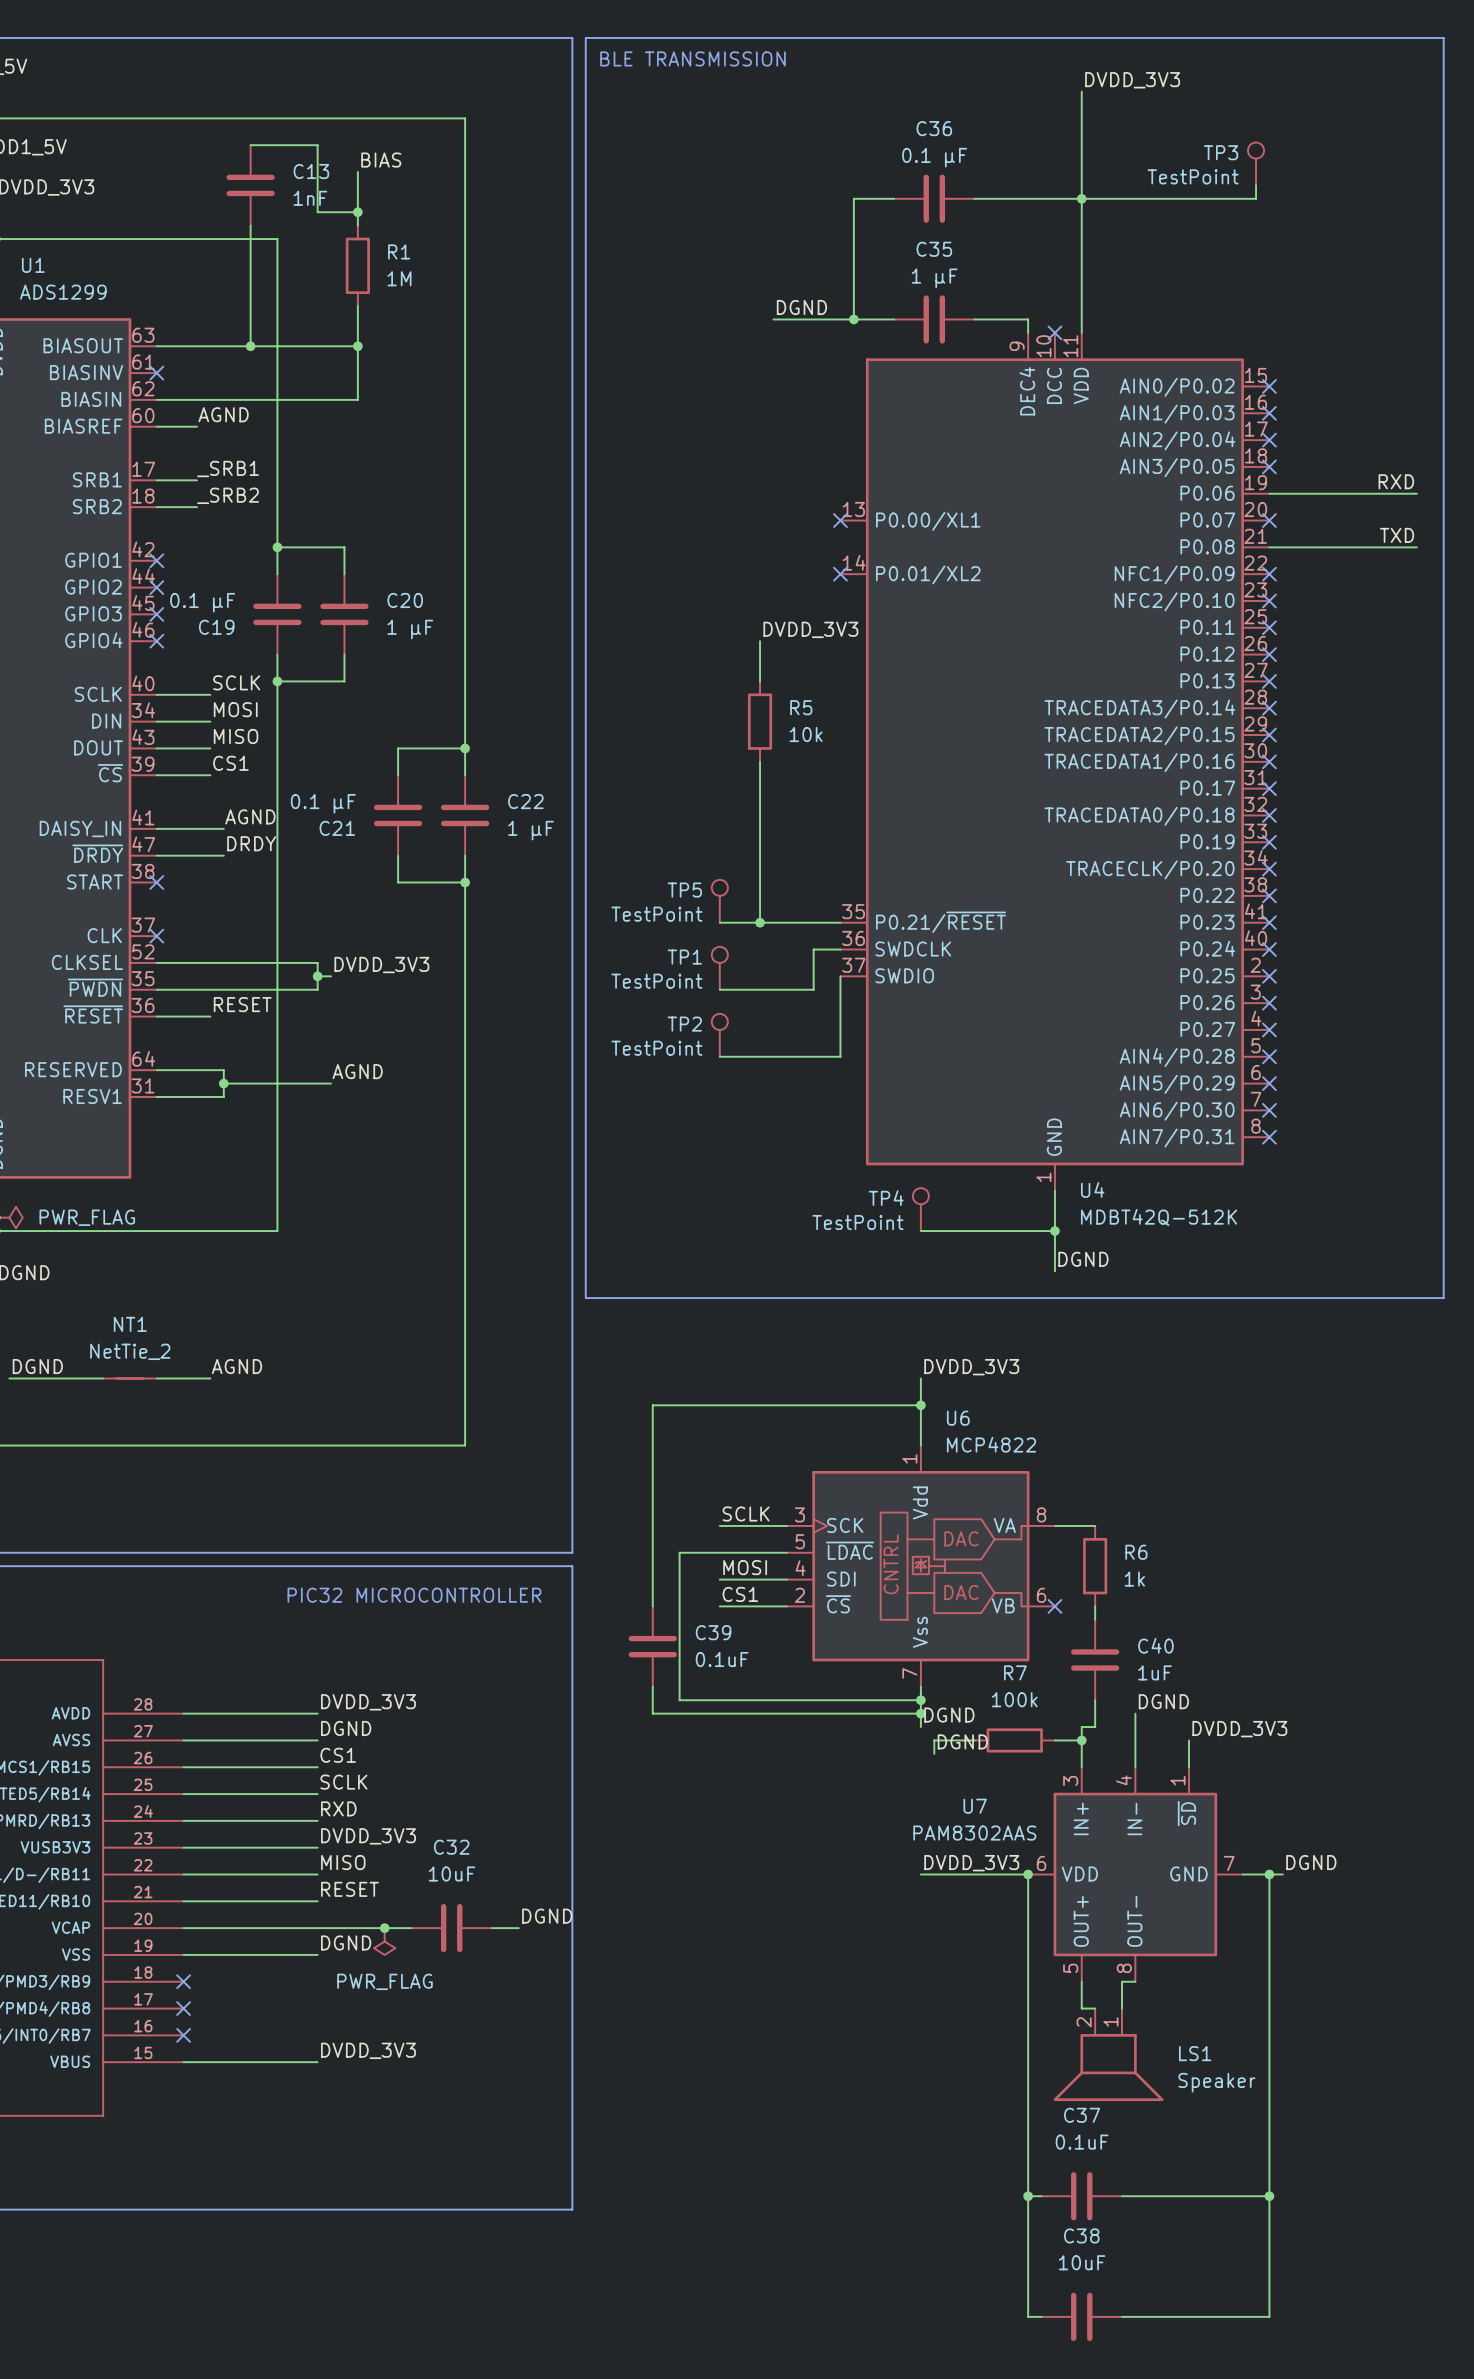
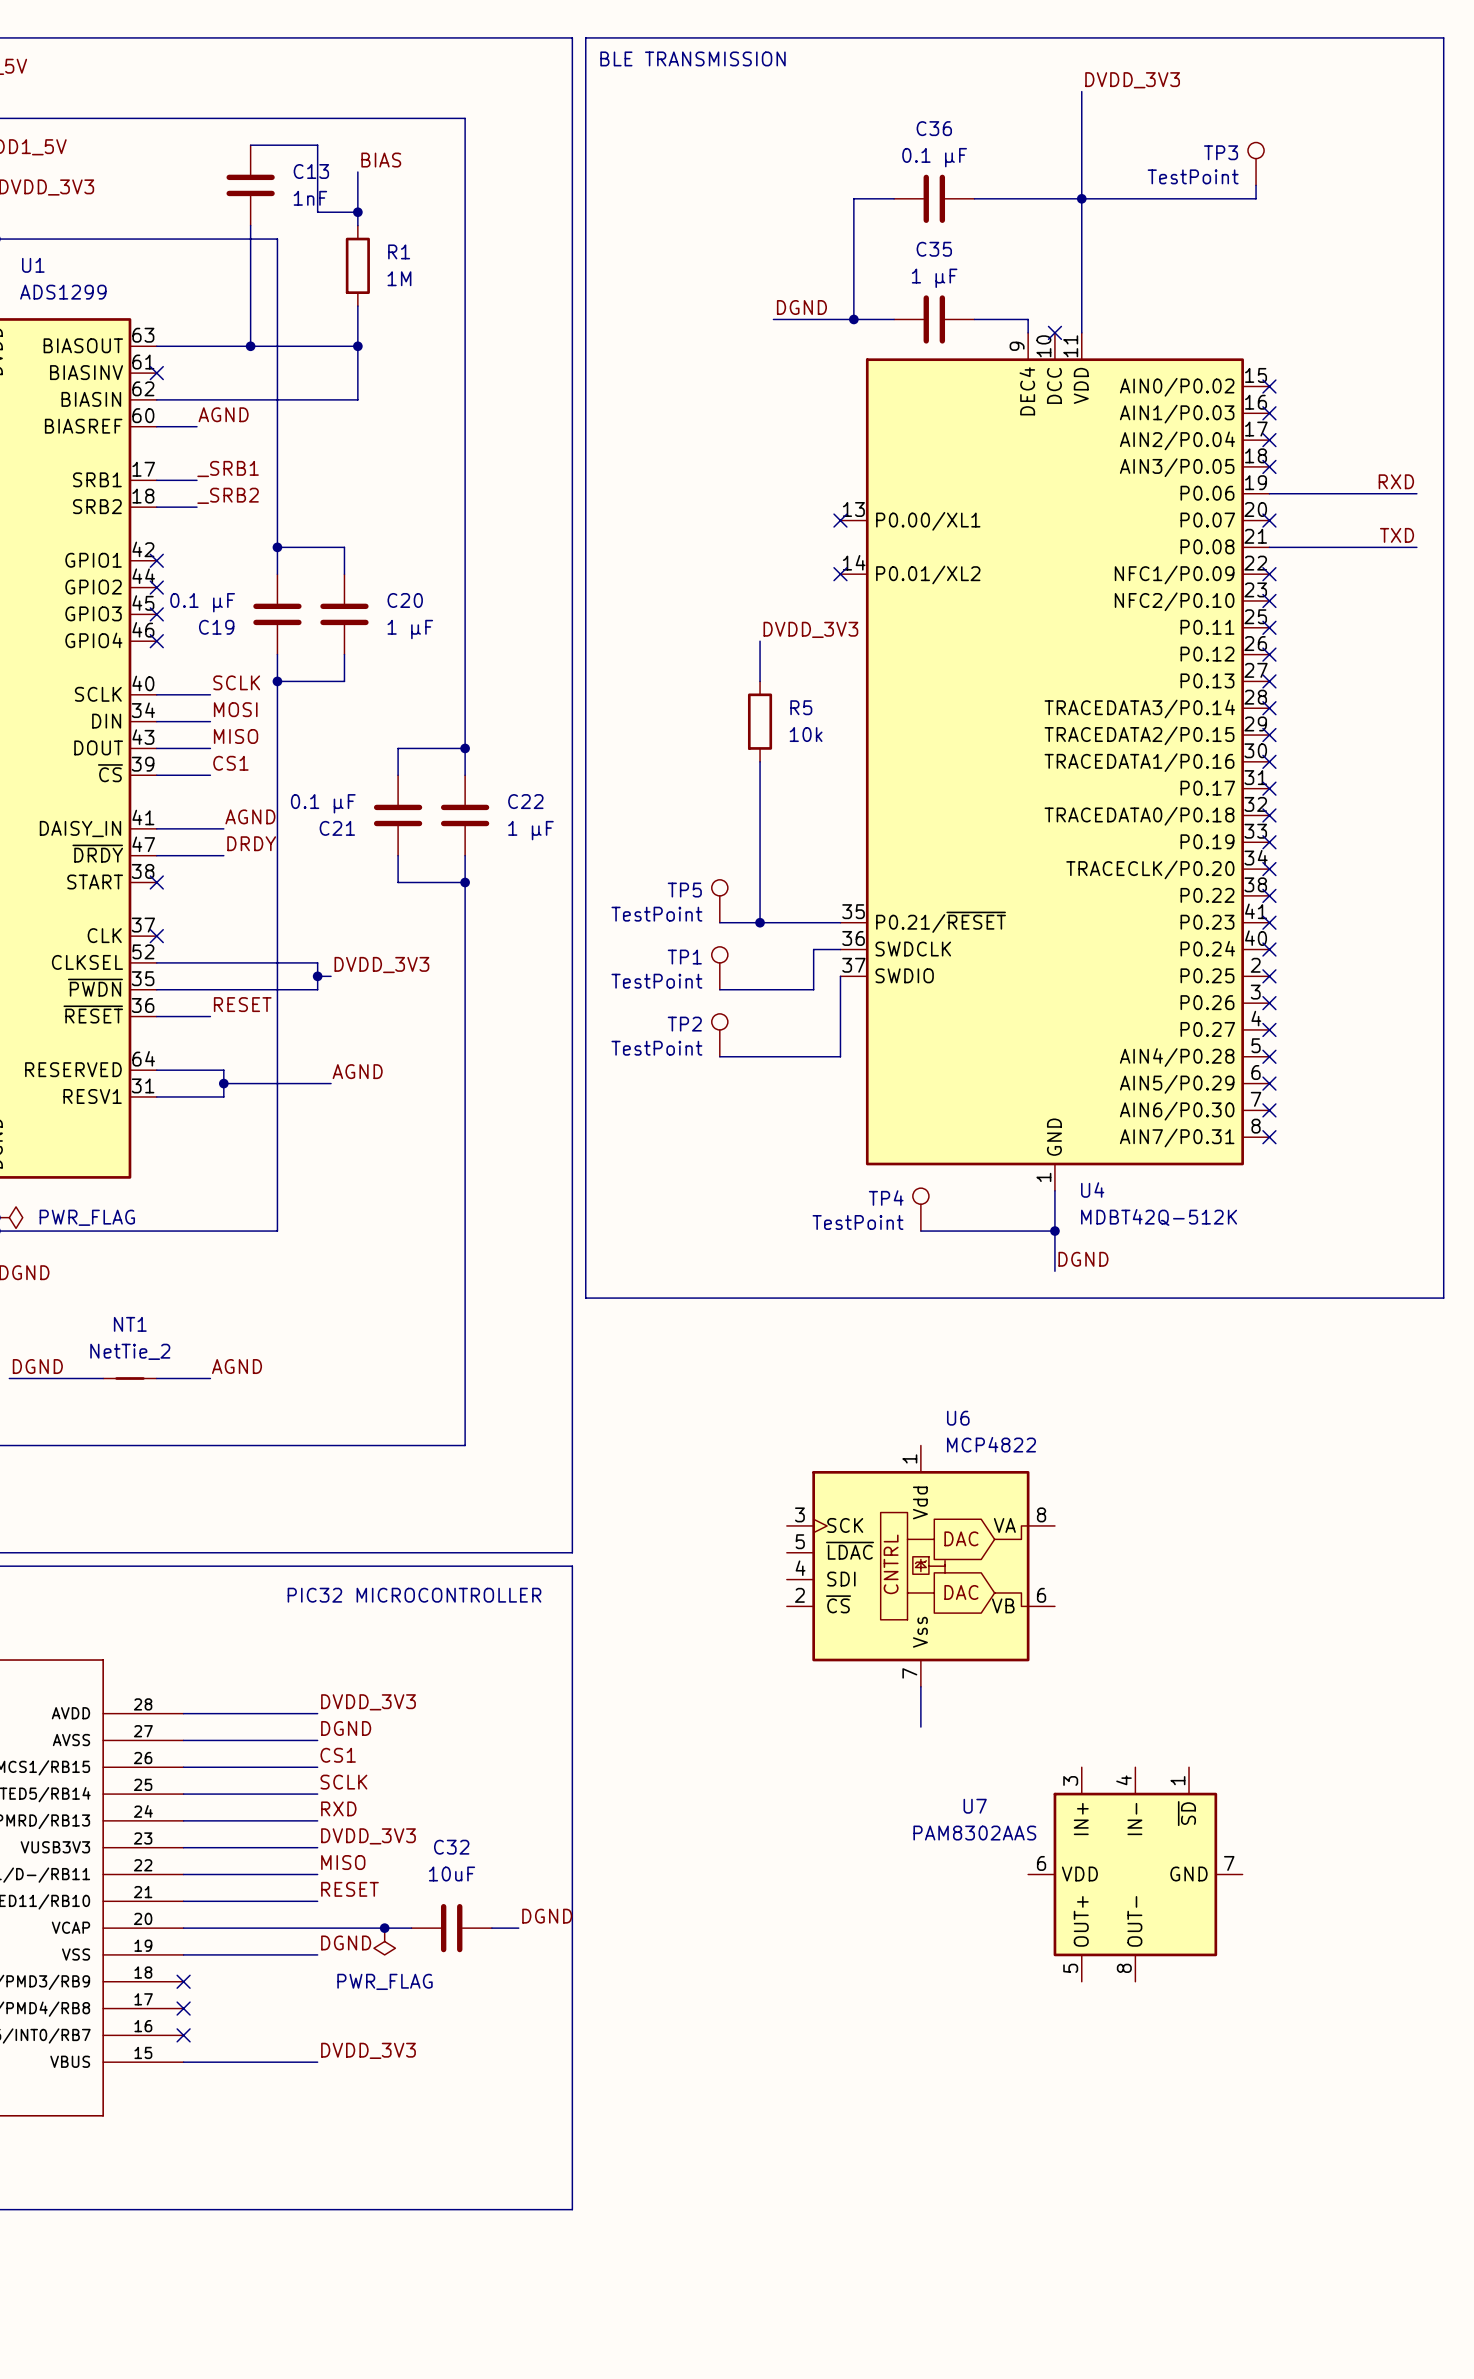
label: DVDD_3V3 (971, 1367) -> none
wire: (920, 1378) (920, 1445) -> none
wire: (920, 1405) (652, 1405) (652, 1606) -> none
junction: (920, 1405) -> none
label: SCLK (746, 1513) -> none
wire: (719, 1525) (786, 1525) -> none
wire: (1054, 1525) (1095, 1525) -> none
wire: (786, 1552) (679, 1552) (679, 1700) (920, 1700) -> none
R6: 1k (1095, 1566) -> none
label: MOSI (745, 1567) -> none
wire: (719, 1579) (786, 1579) -> none
label: CS1 (740, 1594) -> none
wire: (719, 1606) (786, 1606) -> none
no-connect mark: (1054, 1606) -> none
wire: (1095, 1606) (1095, 1619) -> none
C39: 0.1uF (652, 1646) -> none
C40: 1uF (1095, 1660) -> none
wire: (652, 1686) (652, 1713) (920, 1713) -> none
junction: (920, 1700) -> none
wire: (1095, 1700) (1095, 1727) (1081, 1727) (1081, 1767) -> none
label: DGND (1163, 1701) -> none
junction: (920, 1713) -> none
wire: (1135, 1713) (1135, 1767) -> none
label: DGND (949, 1715) -> none
label: DVDD_3V3 (1239, 1729) -> none
wire: (974, 1740) (934, 1740) (934, 1753) -> none
R7: 100k (1014, 1740) -> none
wire: (1054, 1740) (1081, 1740) -> none
junction: (1081, 1740) -> none
wire: (1189, 1740) (1189, 1767) -> none
label: DGND (962, 1741) -> none
label: DGND (1311, 1862) -> none
label: DVDD_3V3 (971, 1863) -> none
wire: (920, 1874) (1028, 1874) (1028, 2316) (1041, 2316) -> none
junction: (1028, 1874) -> none
wire: (1242, 1874) (1282, 1874) -> none
wire: (1269, 1874) (1269, 2316) (1121, 2316) -> none
junction: (1269, 1874) -> none
wire: (1081, 1981) (1081, 2008) (1095, 2008) -> none
wire: (1135, 1981) (1121, 1981) (1121, 2008) -> none
LS1: Speaker (1108, 2054) -> none
wire: (1028, 2196) (1041, 2196) -> none
junction: (1028, 2196) -> none
C37: 0.1uF (1081, 2196) -> none
wire: (1121, 2196) (1269, 2196) -> none
junction: (1269, 2196) -> none
C38: 10uF (1081, 2316) -> none

